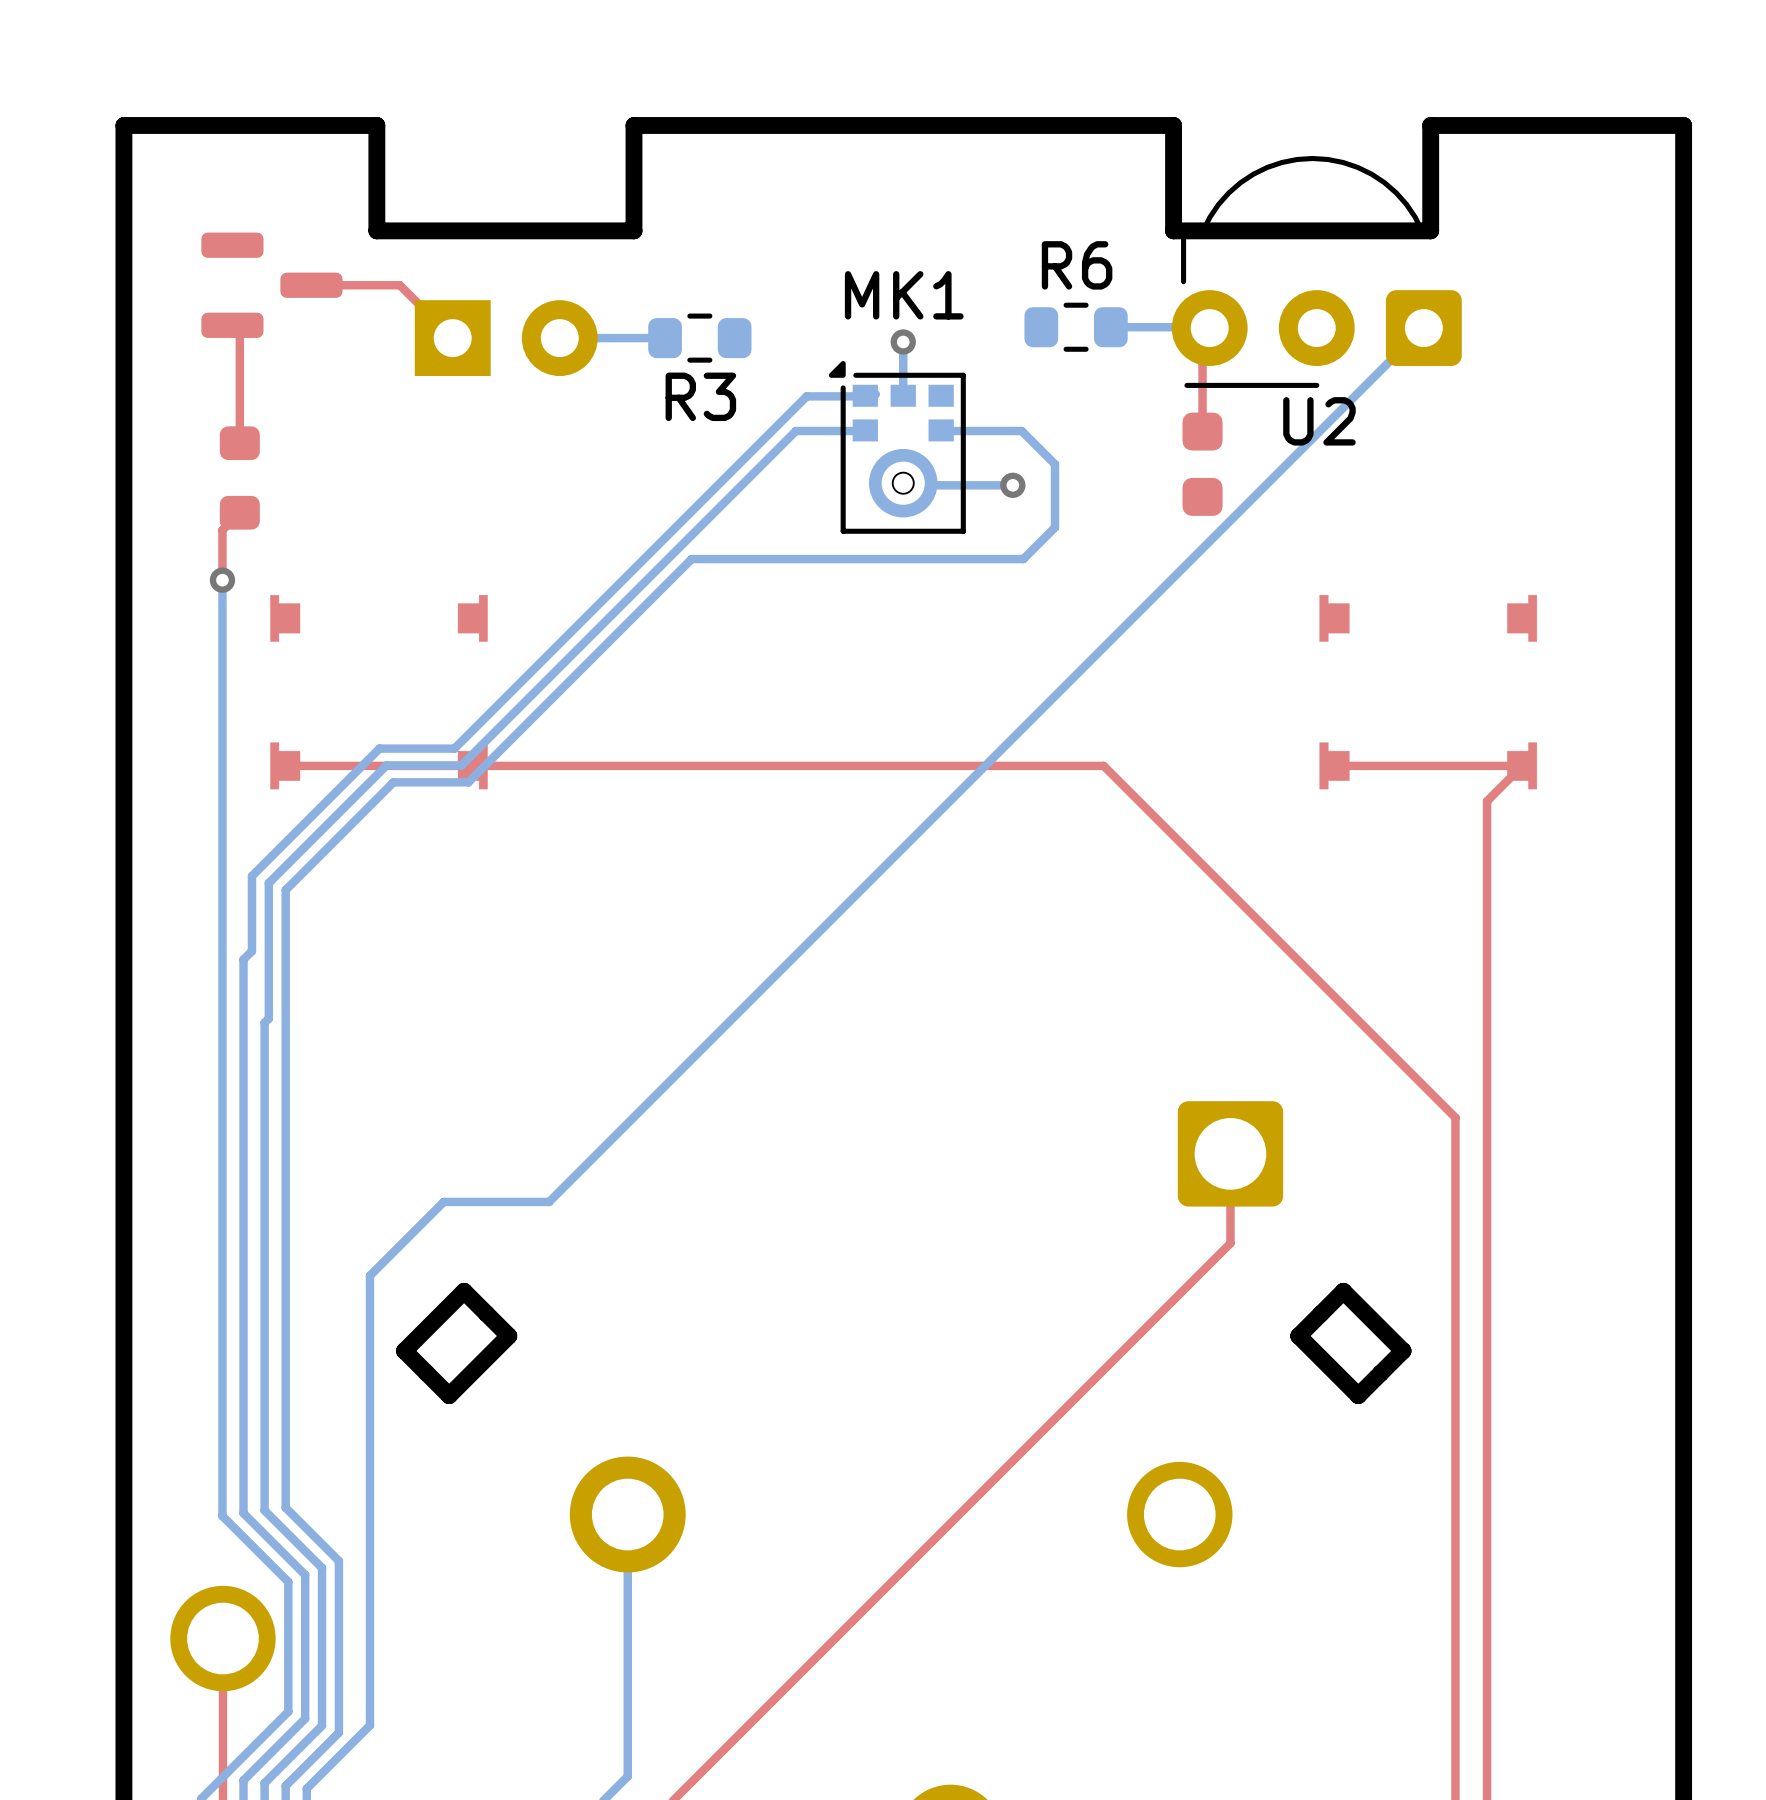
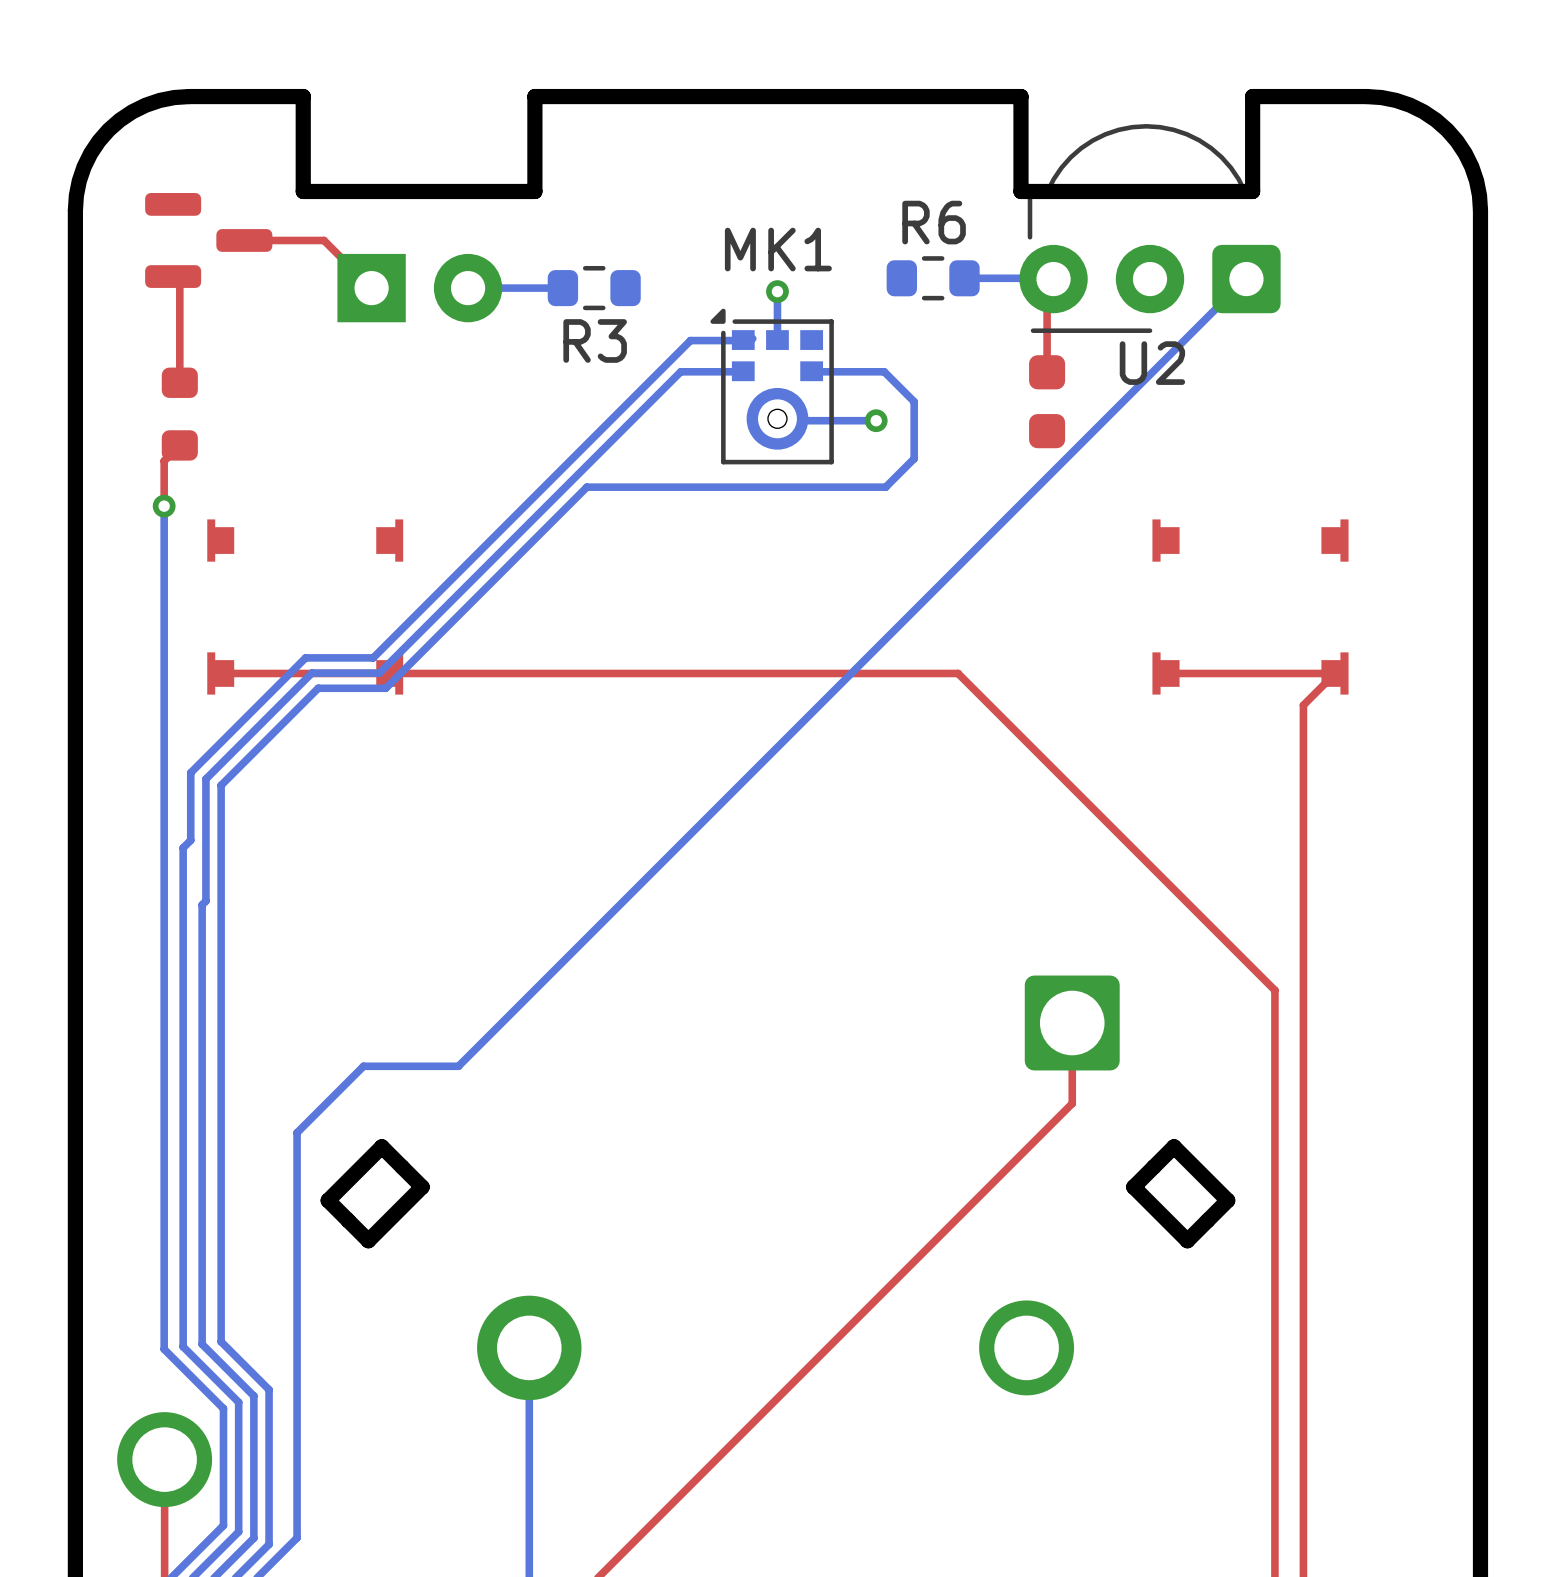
board edge: (250, 125) (123, 125) (123, 251) -> (189, 96) (159, 100) (145, 105) (119, 120) (108, 129) (90, 153) (84, 166) (76, 195) (75, 210)
board edge: (1557, 125) (1683, 125) (1683, 251) -> (1366, 96) (1381, 97) (1410, 105) (1435, 120) (1447, 129) (1465, 153) (1471, 166) (1476, 180) (1480, 210)

